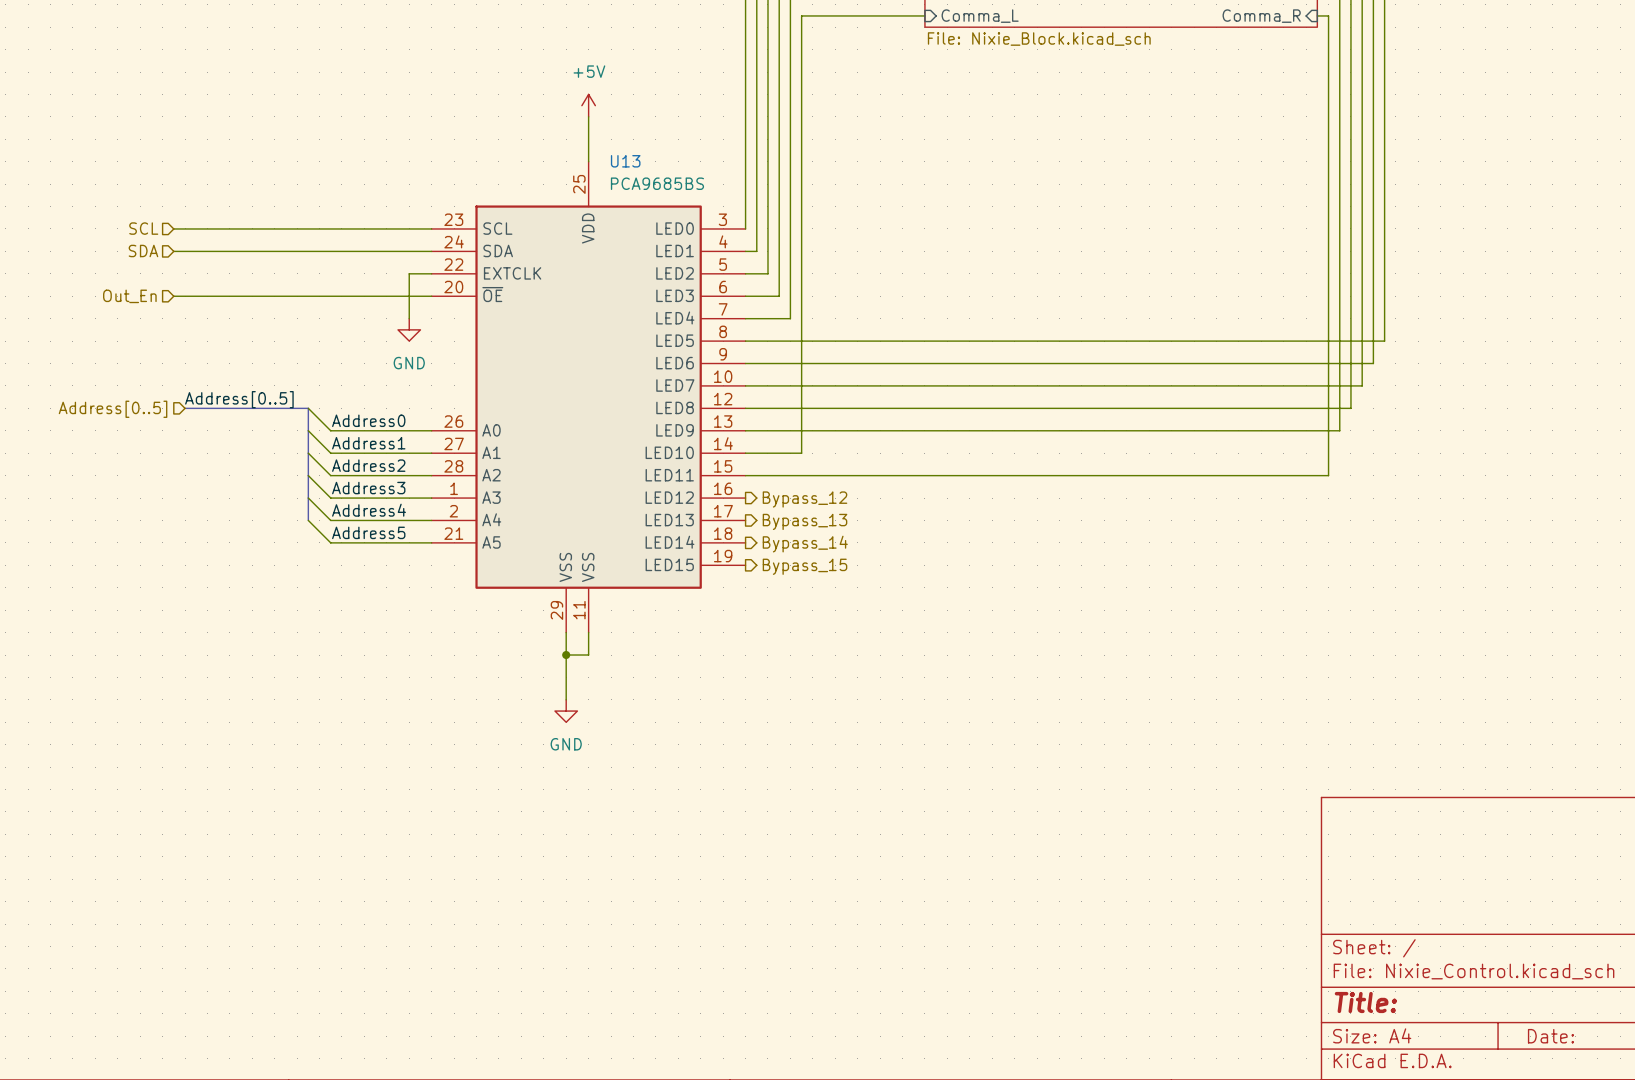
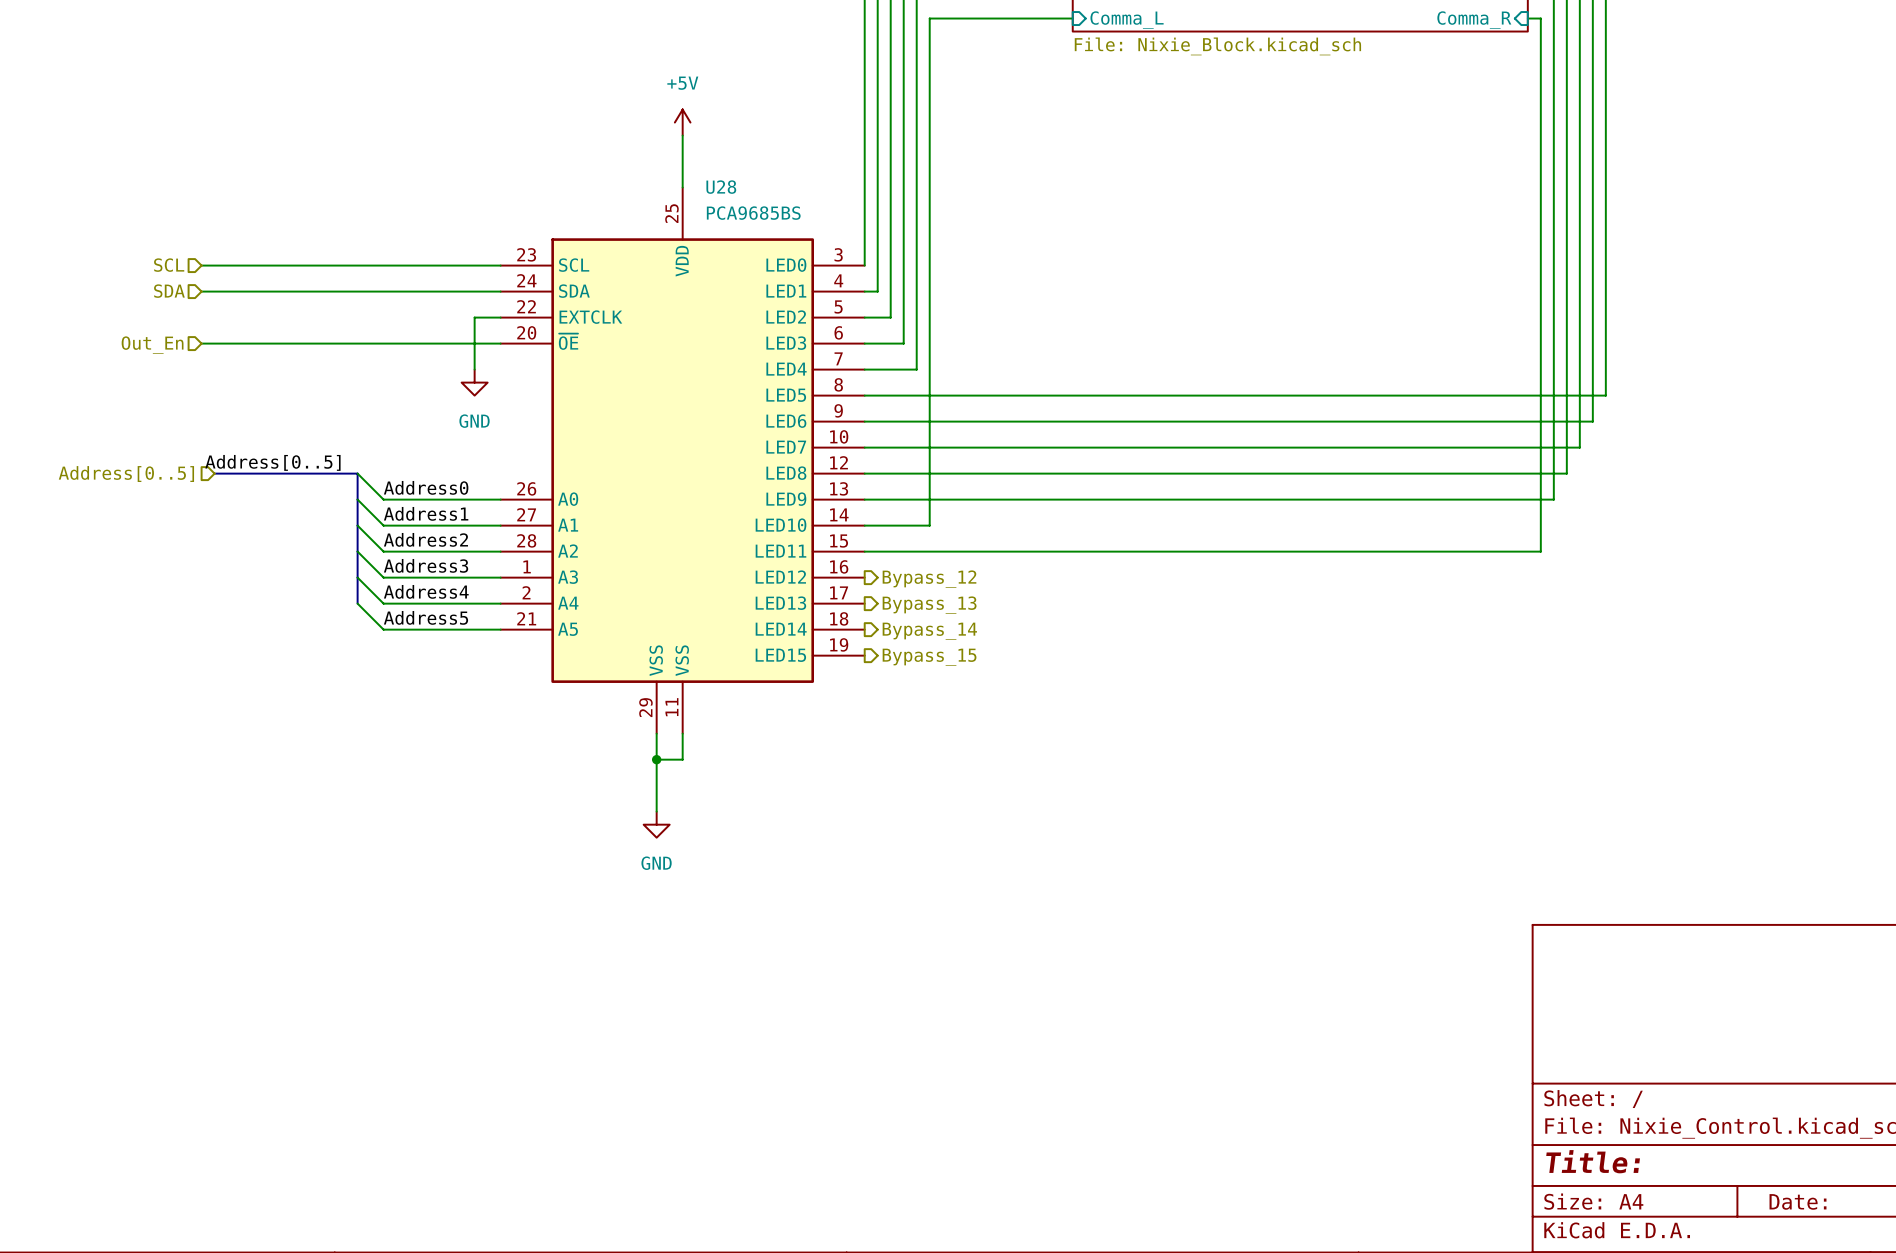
U13 name: U13 (625, 161) -> U28 (721, 187)

